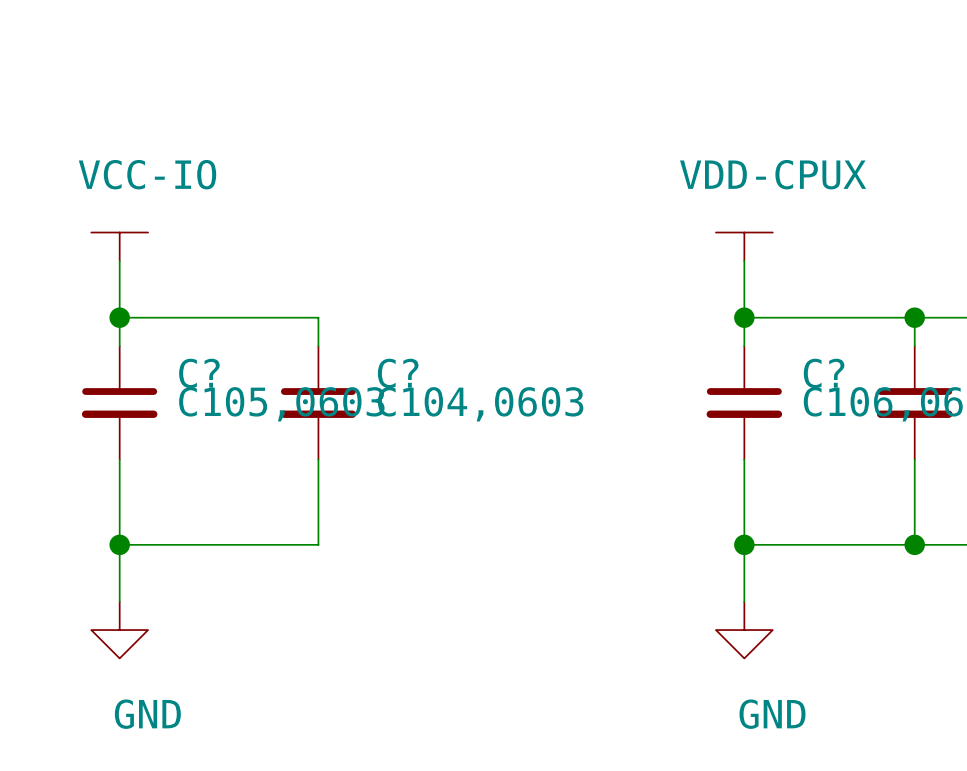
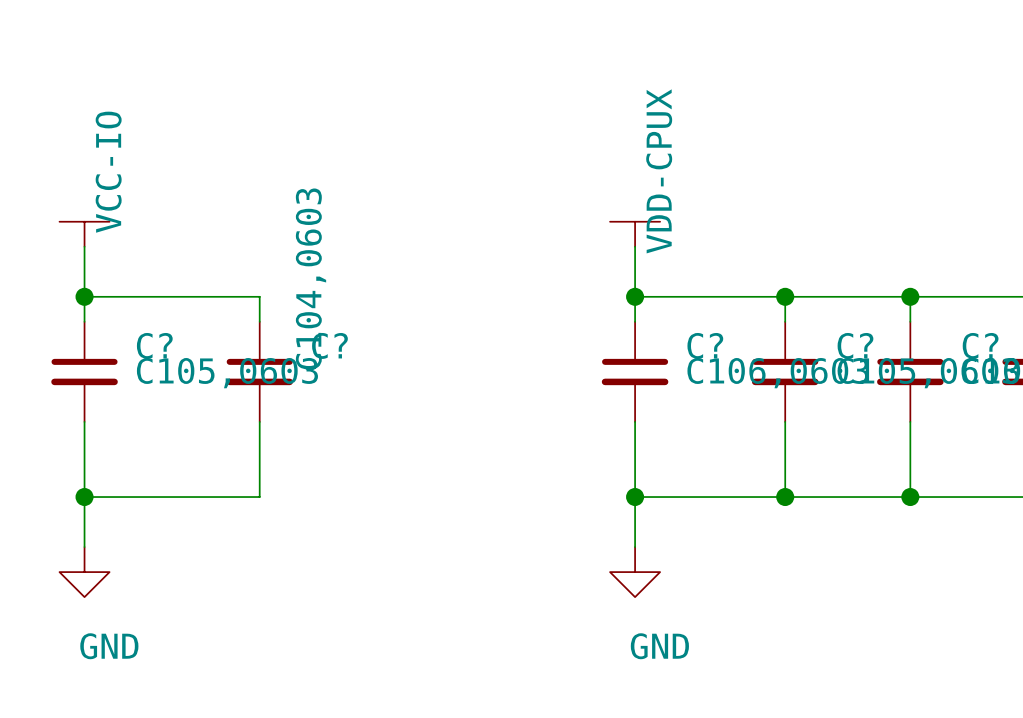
power symbol text rotation: 0° (147, 174) -> 90° counterclockwise (108, 172)
power symbol text rotation: 0° (773, 174) -> 90° counterclockwise (659, 171)
C? value rotation: 0° (480, 404) -> 90° counterclockwise (311, 279)

